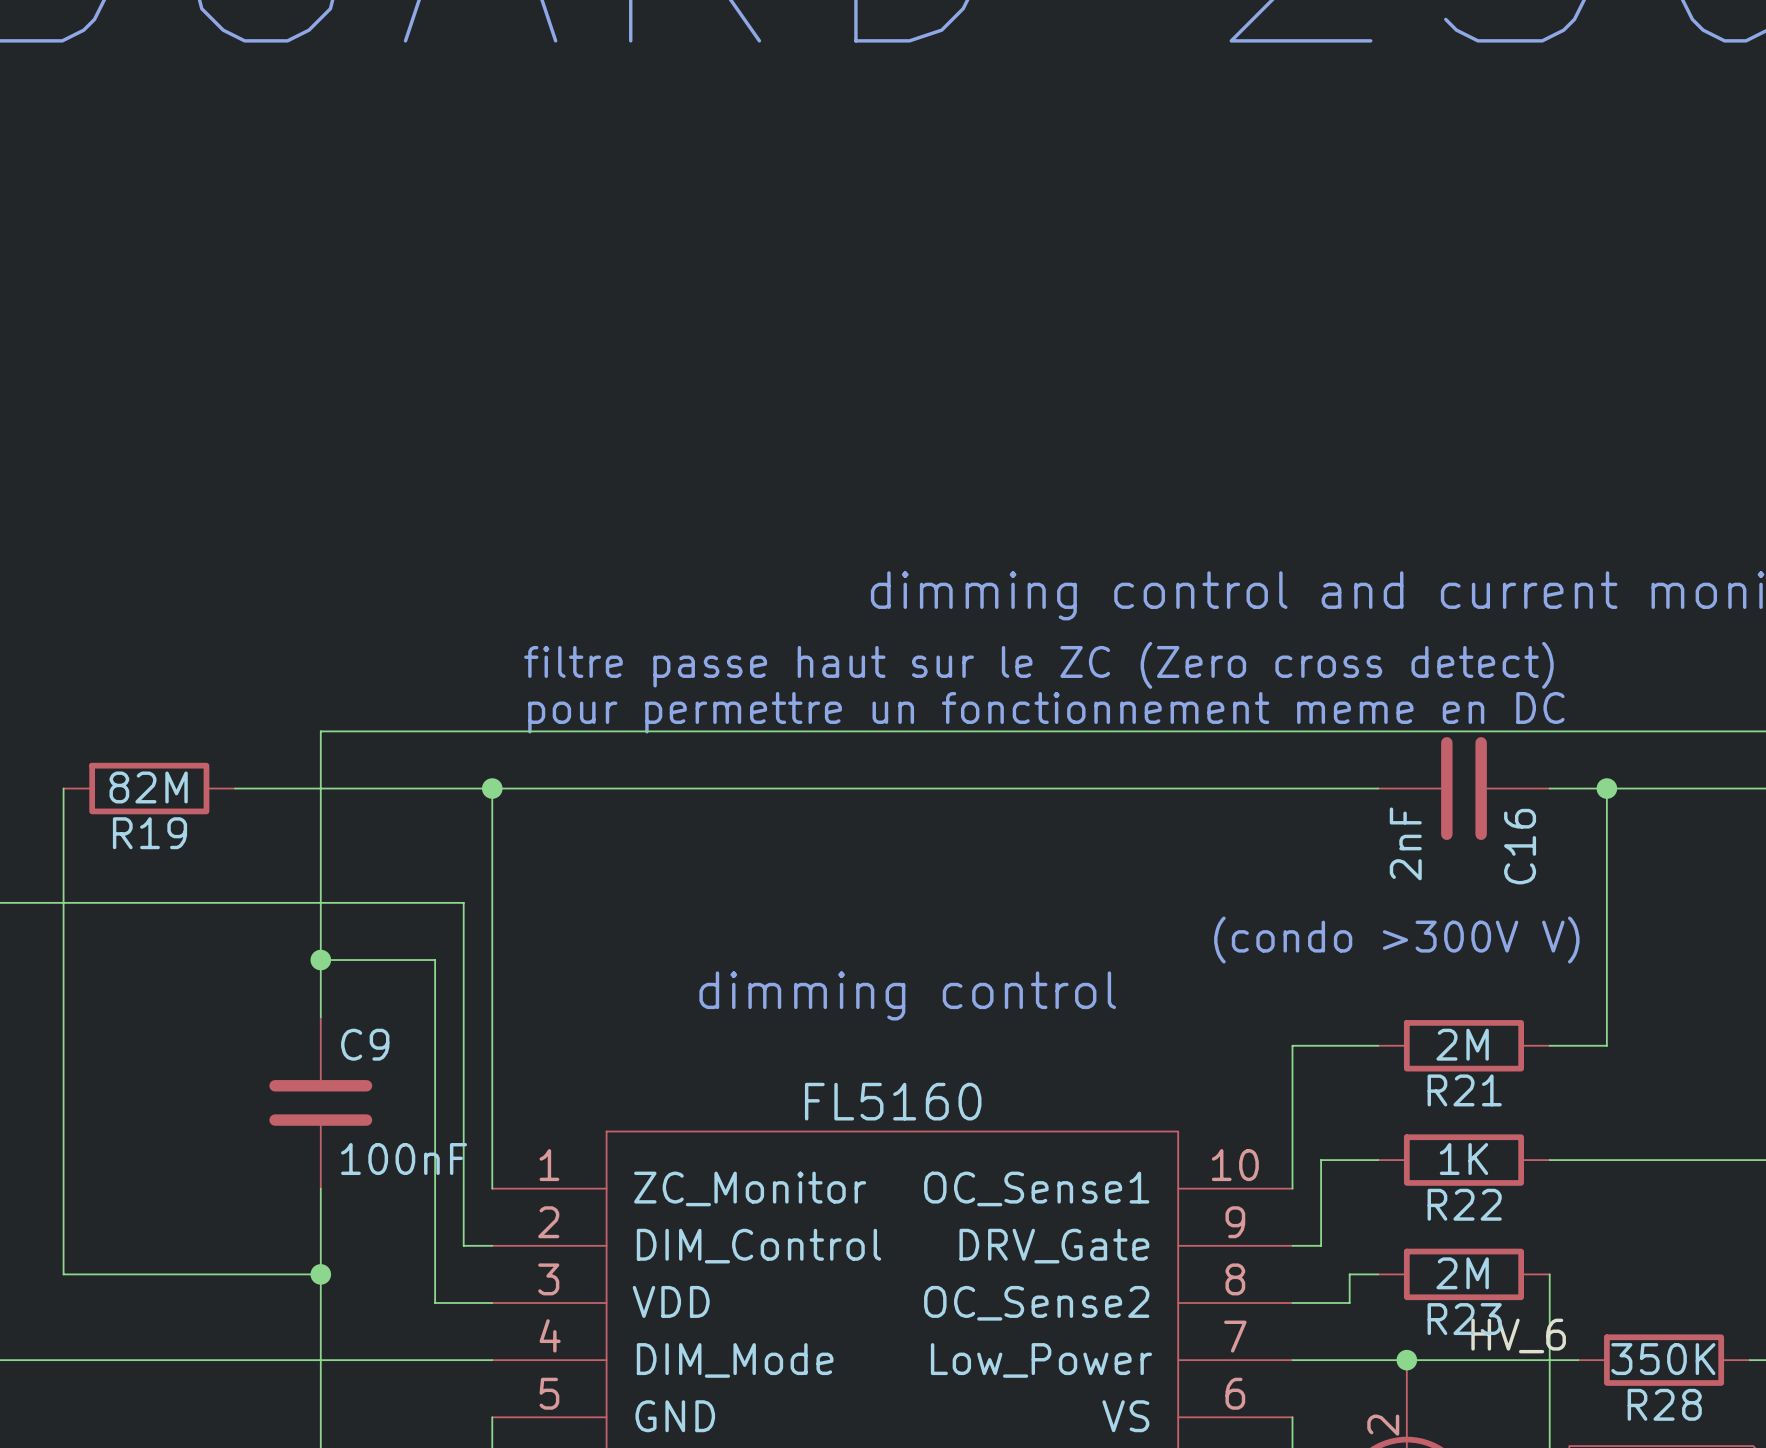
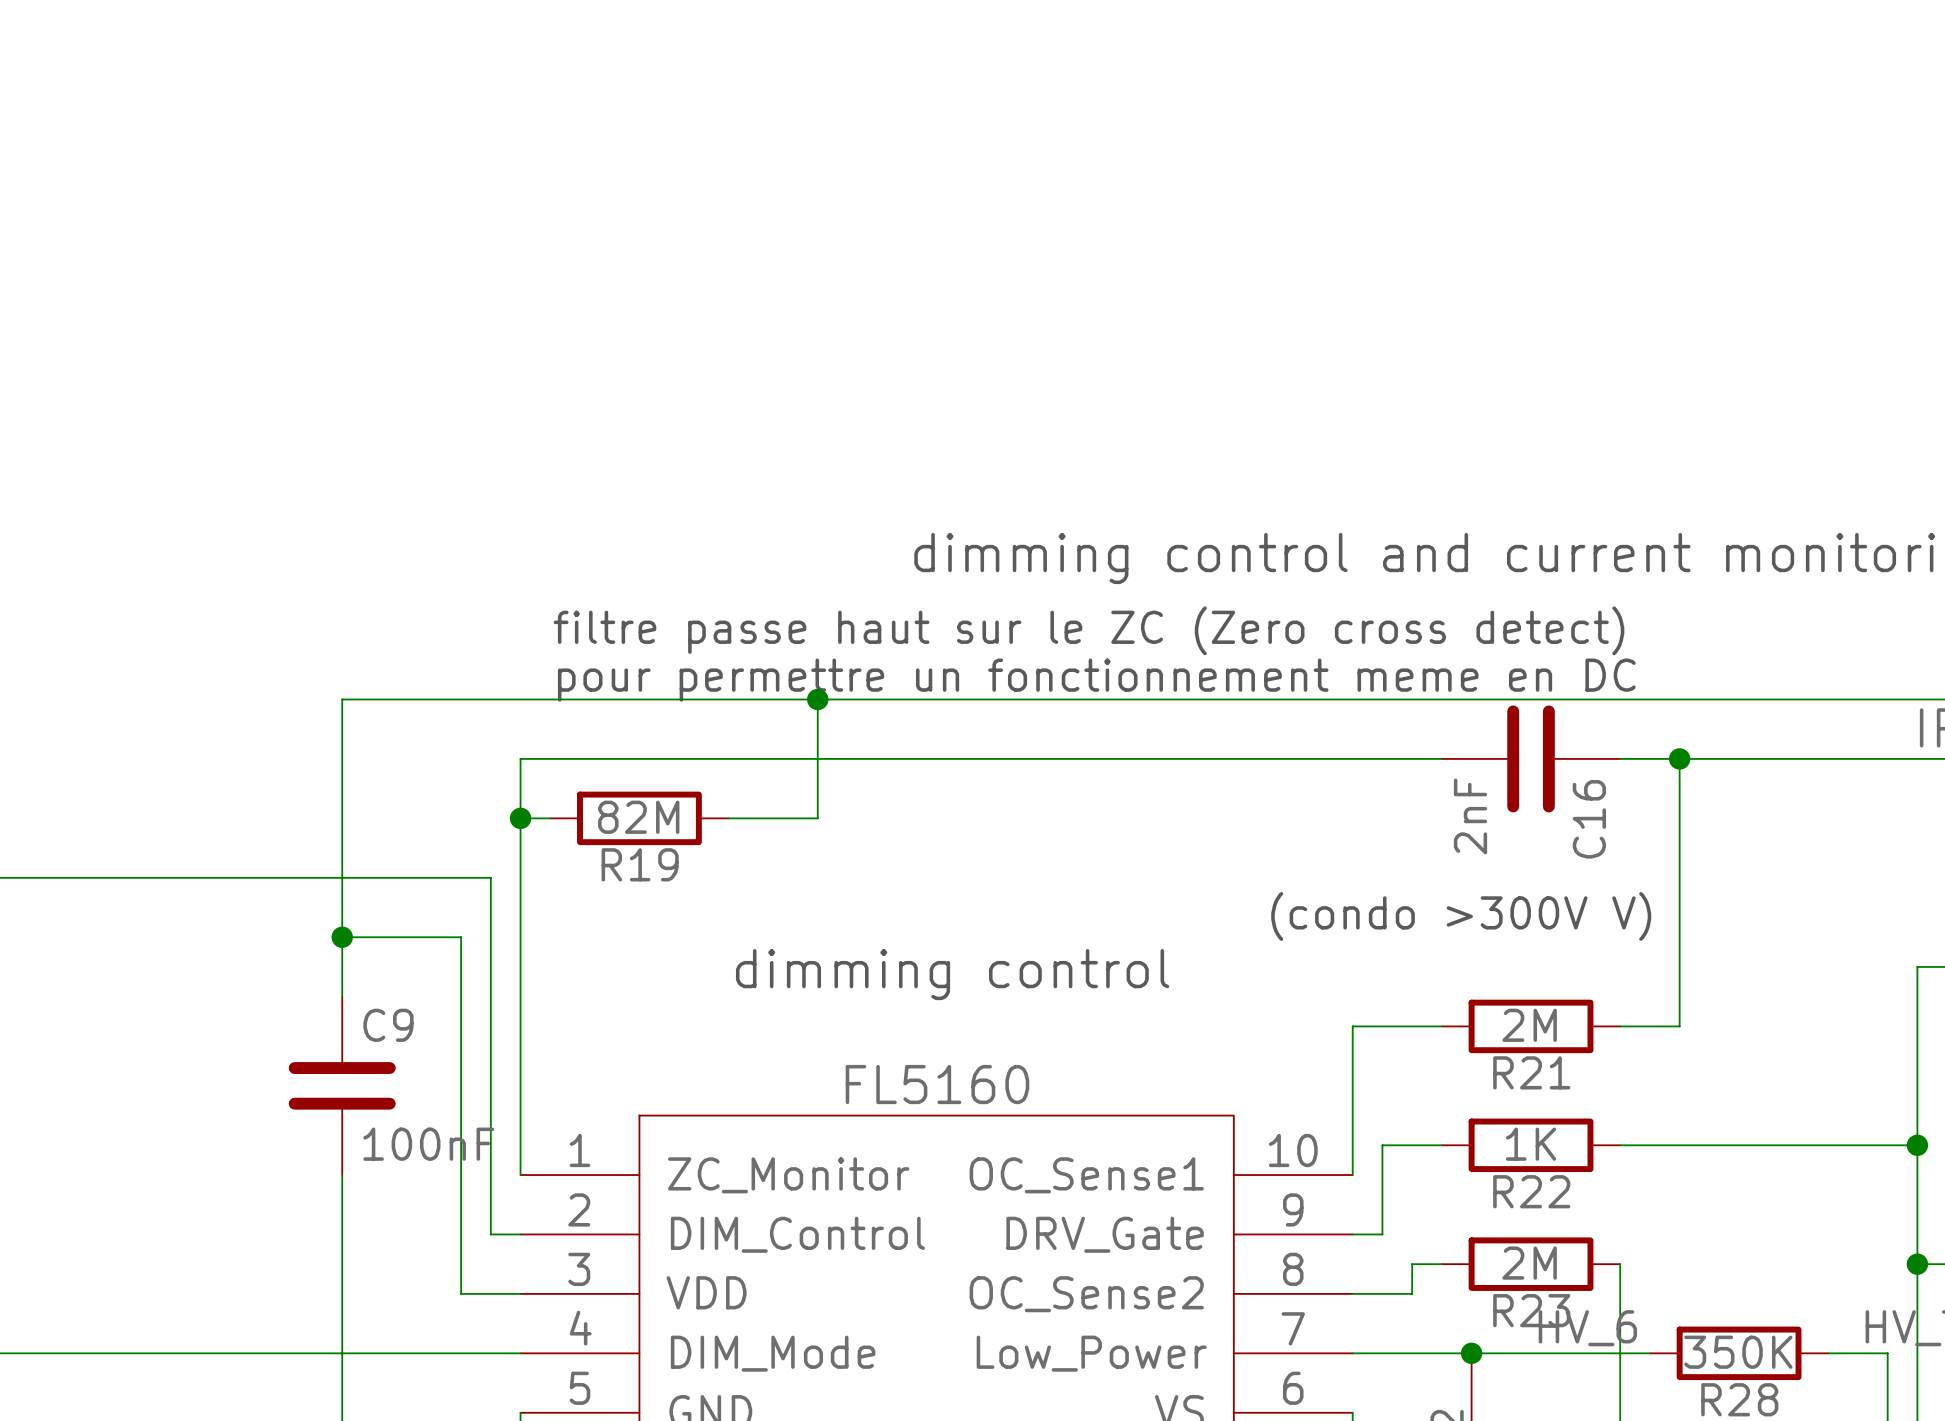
wire: none -> (817, 699) (817, 818) (728, 818)
junction: none -> (817, 699)
wire: (63, 788) (63, 1274) (320, 1274) -> none
R19 position: (149, 788) -> (639, 818)
wire: (235, 788) (492, 788) -> none
junction position: (492, 788) -> (520, 818)
wire: none -> (520, 818) (550, 818)
junction: (320, 1274) -> none

